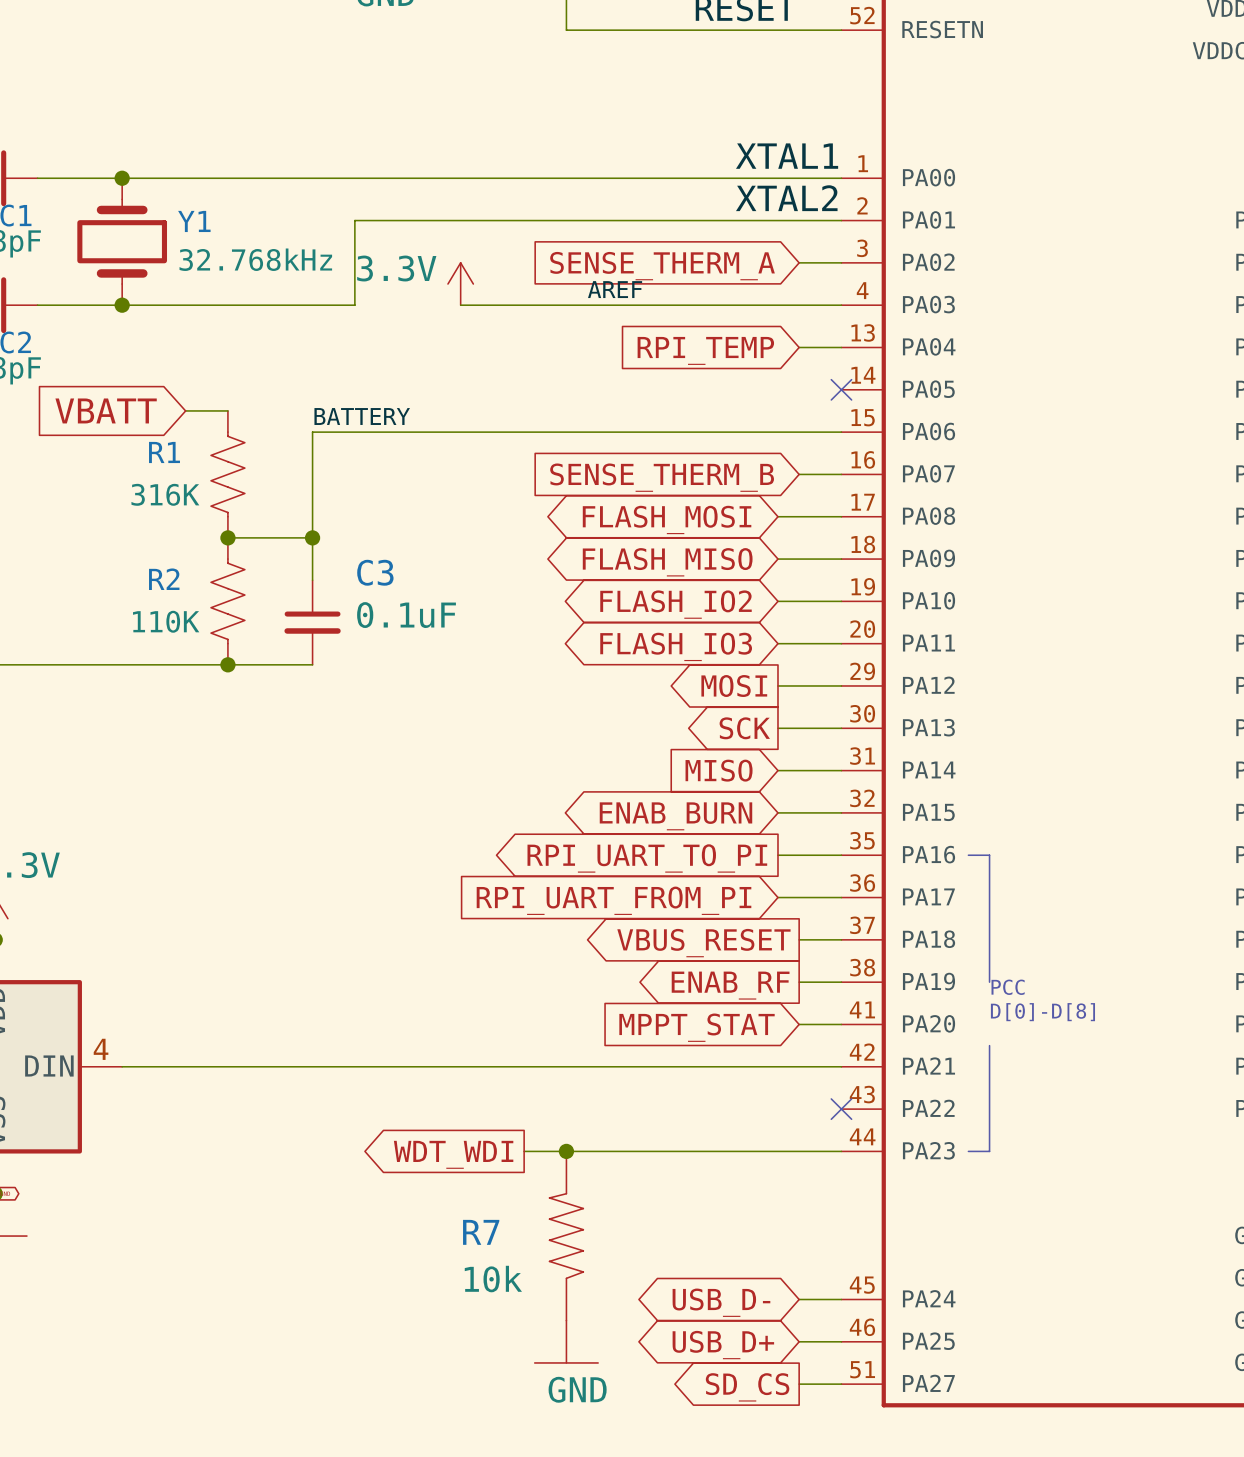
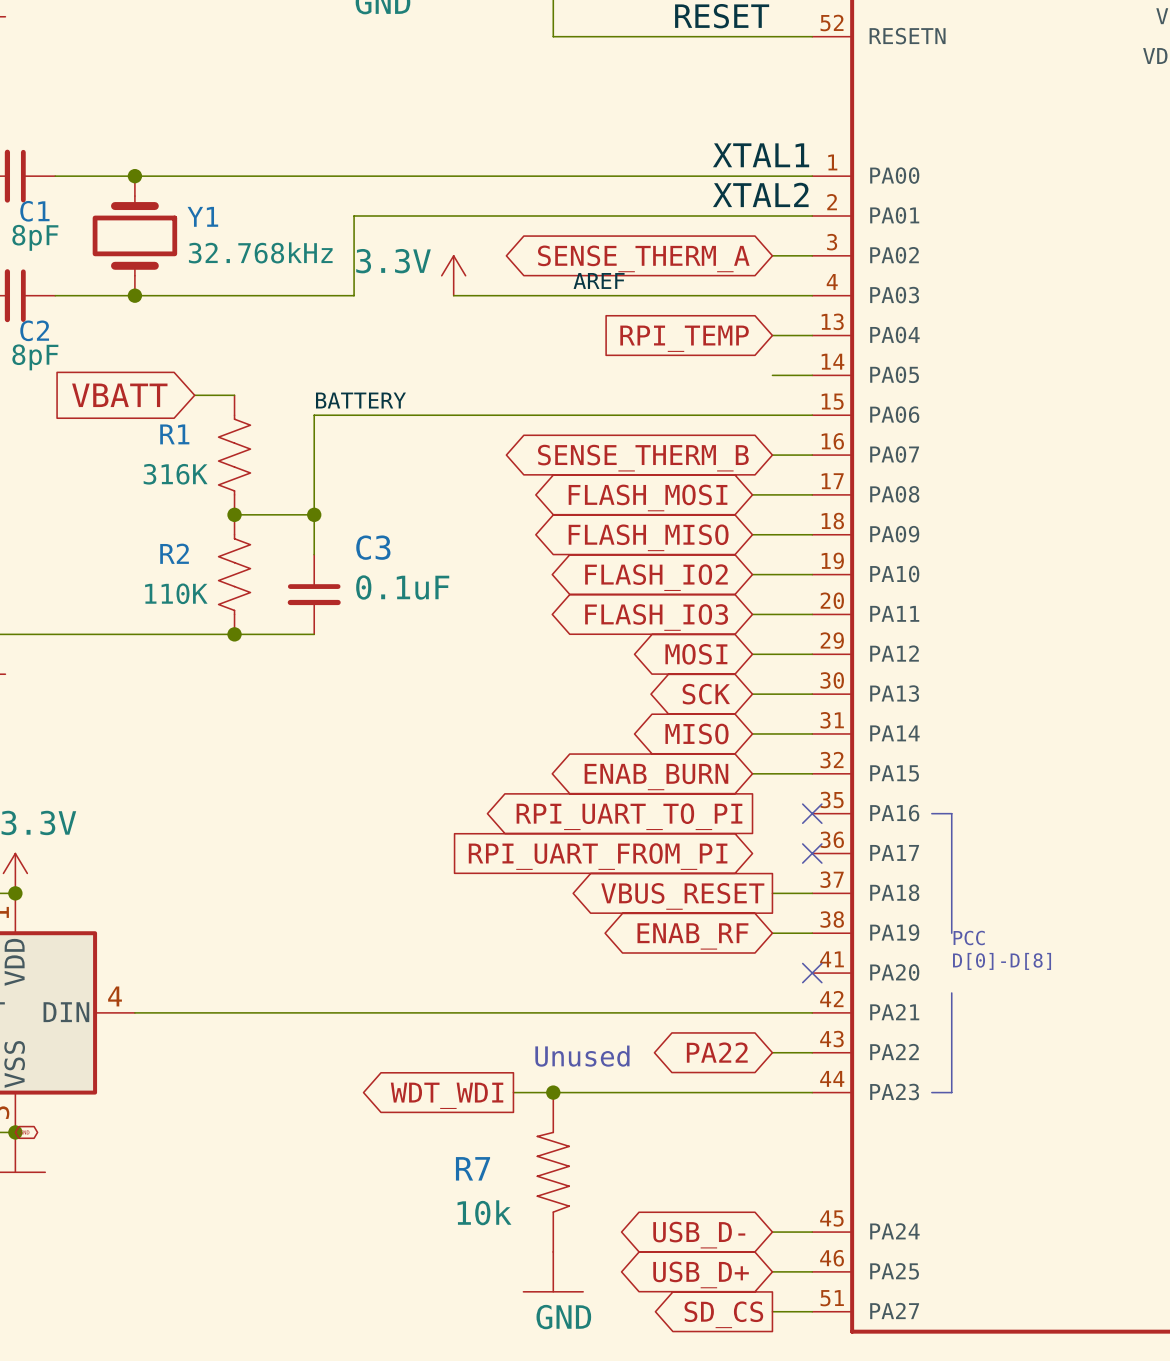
global label shape: input (662, 266) -> bidirectional (643, 258)
wire: none -> (772, 375) (812, 375)
no-connect mark: (841, 389) -> none
global label shape: input (662, 477) -> bidirectional (643, 458)
global label shape: output (734, 686) -> bidirectional (696, 654)
global label shape: output (744, 728) -> bidirectional (706, 694)
global label shape: input (719, 770) -> bidirectional (696, 734)
wire: (777, 855) (841, 855) -> none
no-connect mark: none -> (812, 813)
wire: (777, 897) (841, 897) -> none
no-connect mark: none -> (812, 853)
global label shape: output (730, 985) -> bidirectional (692, 936)
wire: (799, 1024) (841, 1024) -> (772, 1052) (812, 1052)
global label: MPPT_STAT (697, 1027) -> none
global label: none -> PA22 (717, 1052)
no-connect mark position: (841, 1109) -> (812, 973)
text: none -> Unused (582, 1056)

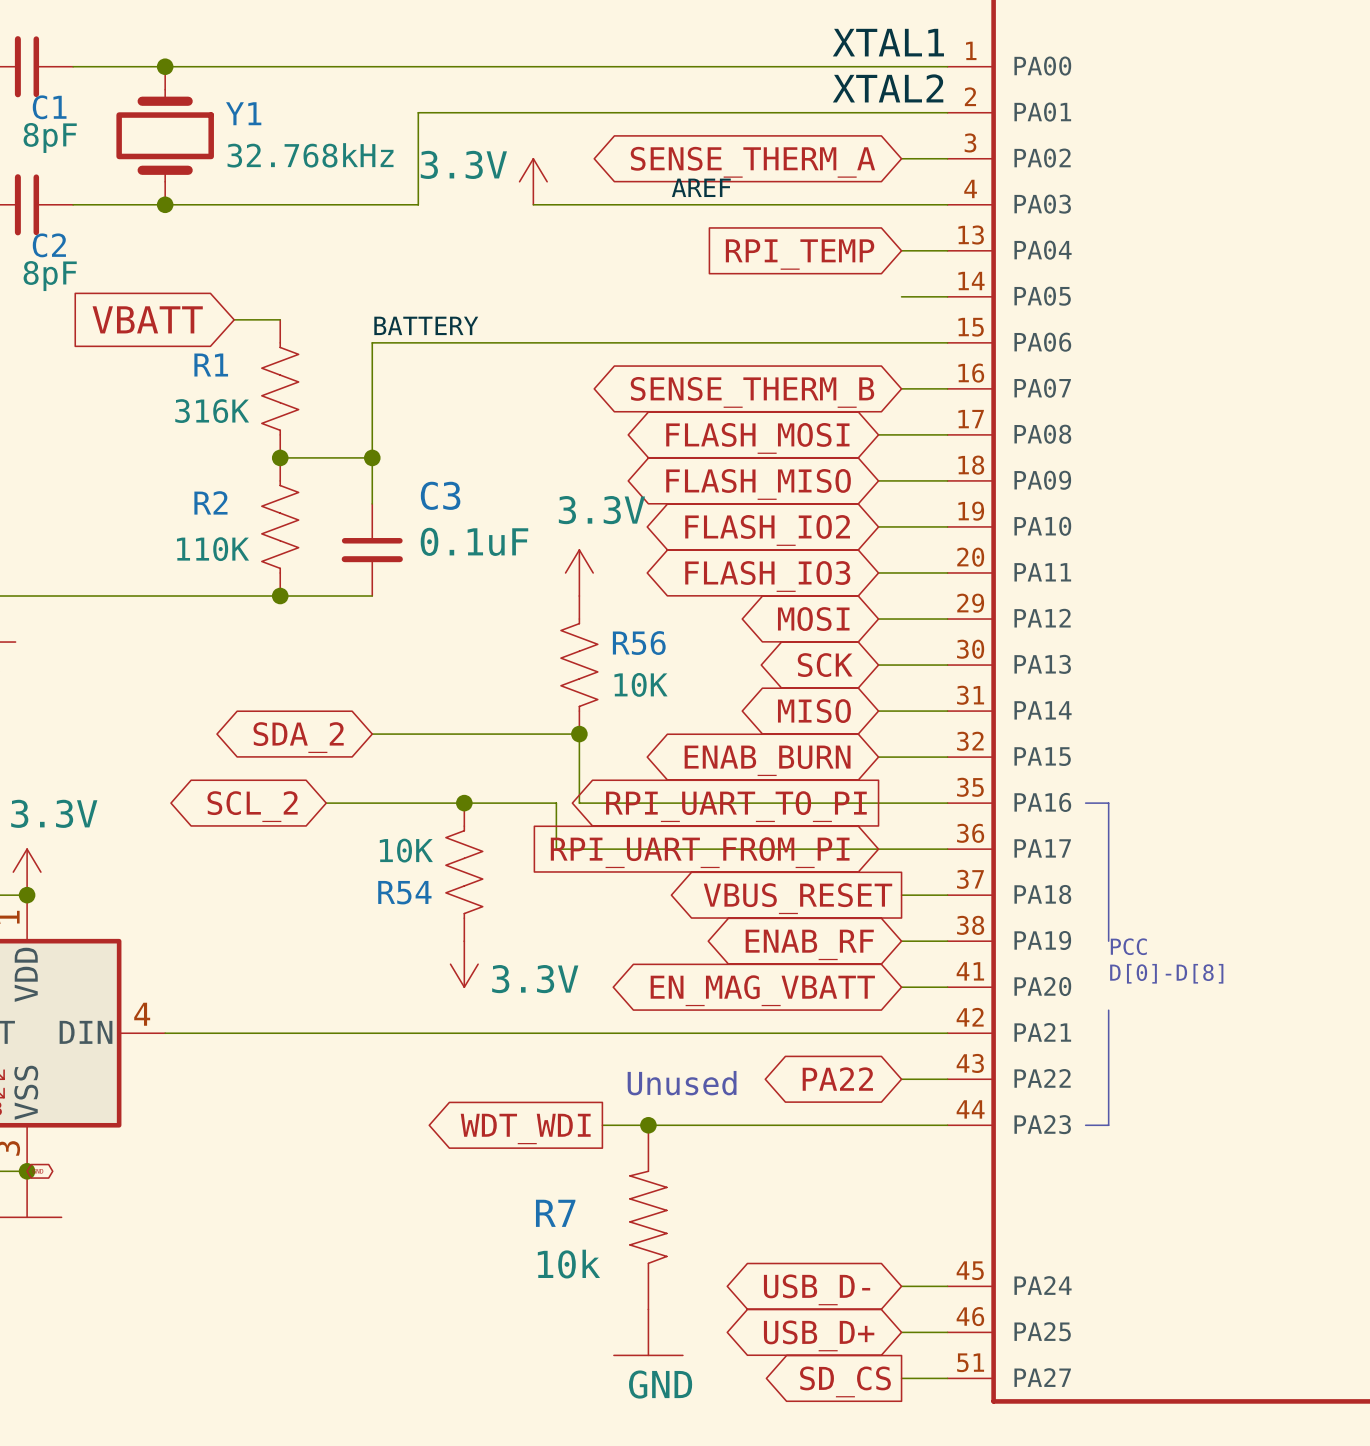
power symbol: none -> 3.3V (579, 572)
R56: none -> 10K (579, 665)
wire: none -> (372, 734) (579, 734) (579, 803) (947, 803)
junction: none -> (579, 734)
global label: none -> SDA_2 (298, 737)
wire: none -> (326, 803) (556, 803) (556, 849) (947, 849)
junction: none -> (464, 803)
no-connect mark: (812, 813) -> none
global label: none -> SCL_2 (252, 806)
no-connect mark: (812, 853) -> none
R54: none -> 10K (464, 872)
power symbol: none -> 3.3V (464, 964)
wire: none -> (901, 987) (947, 987)
no-connect mark: (812, 973) -> none
global label: none -> EN_MAG_VBATT (762, 990)

